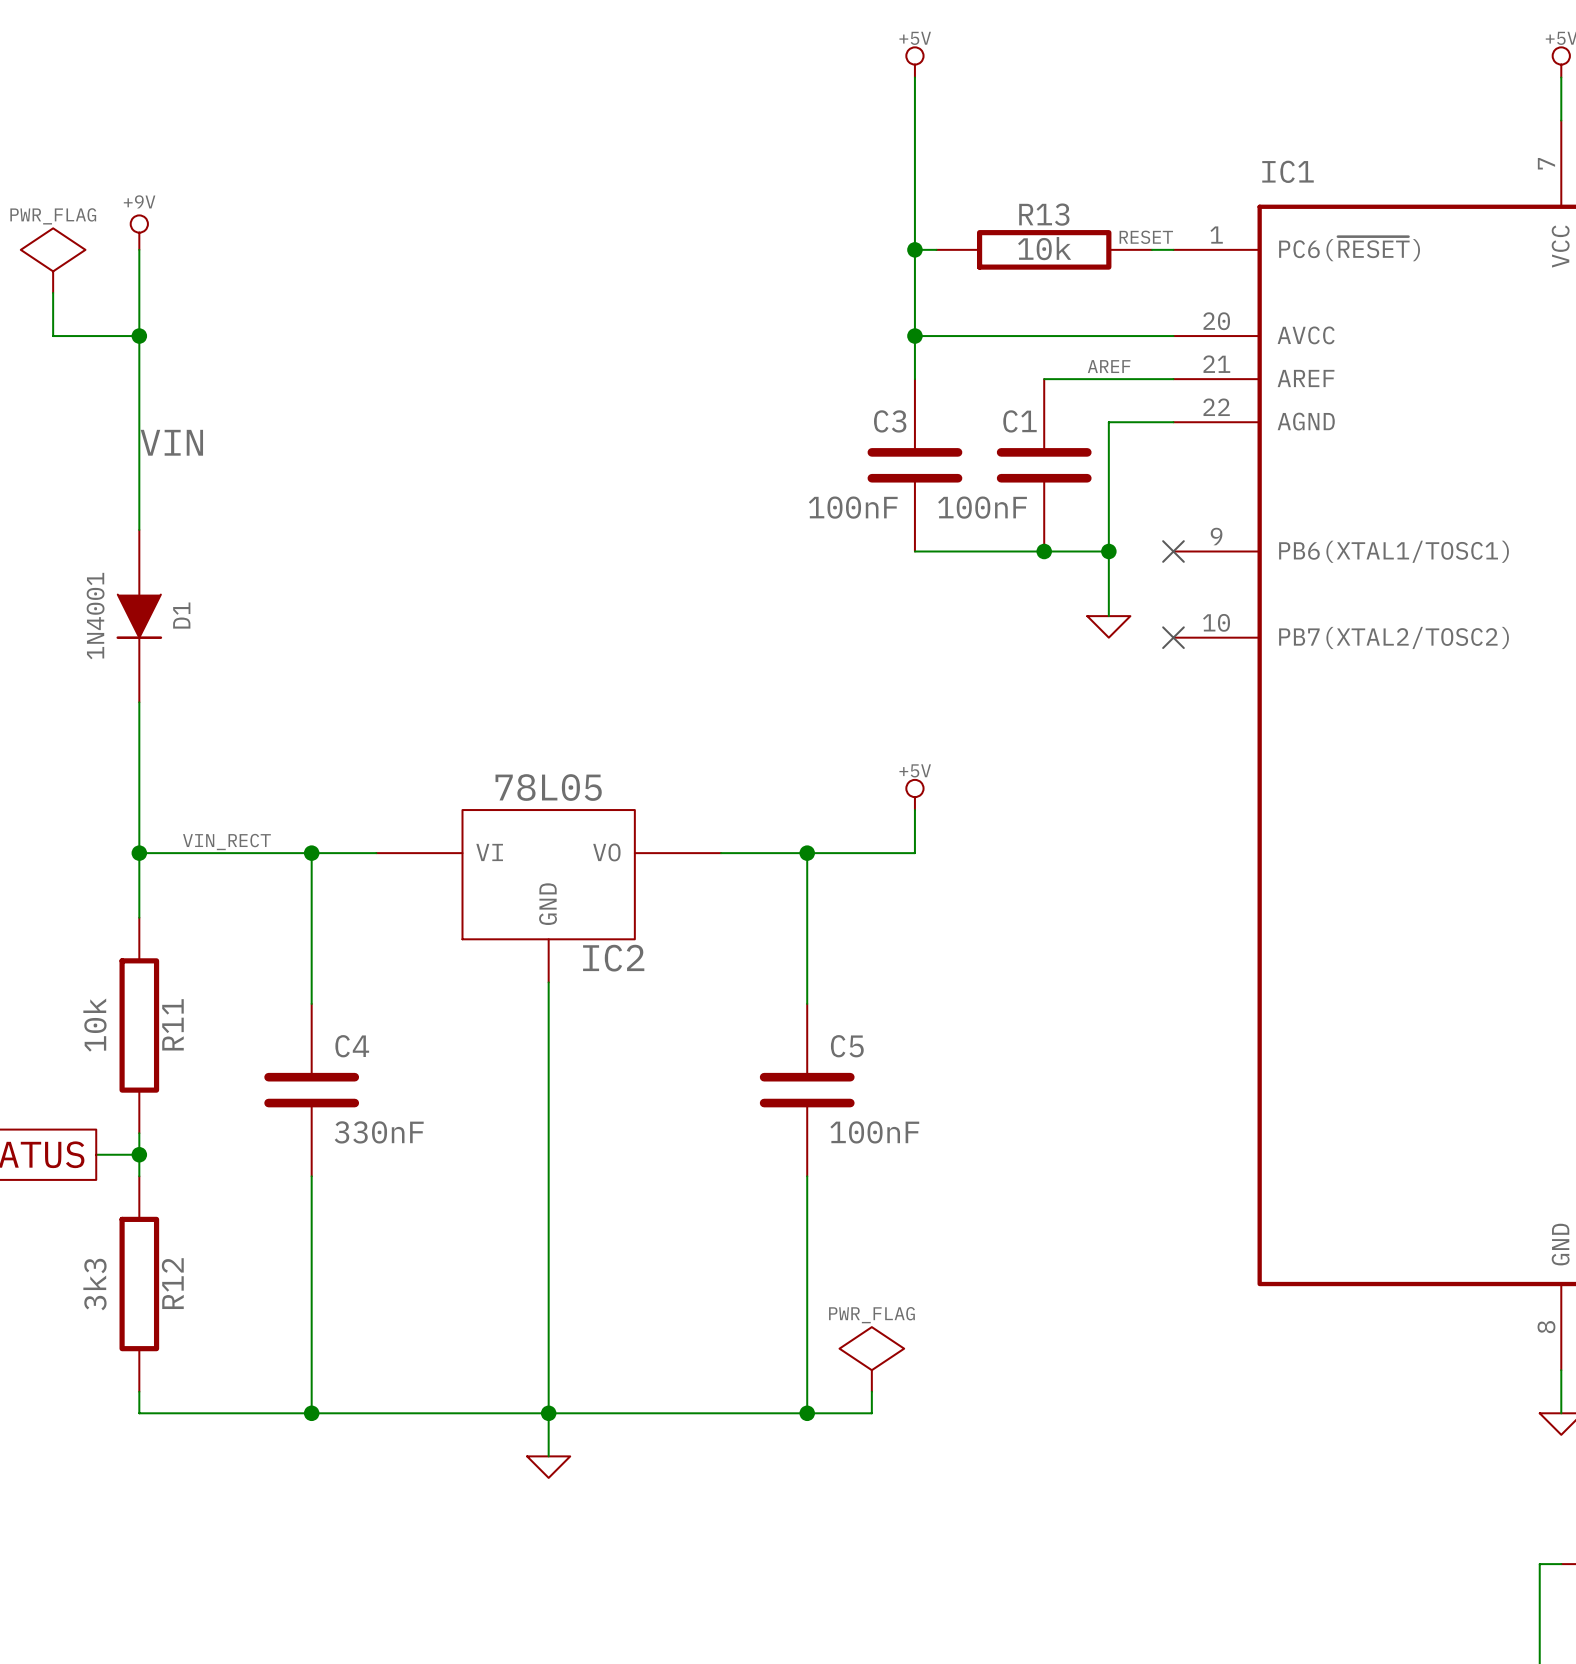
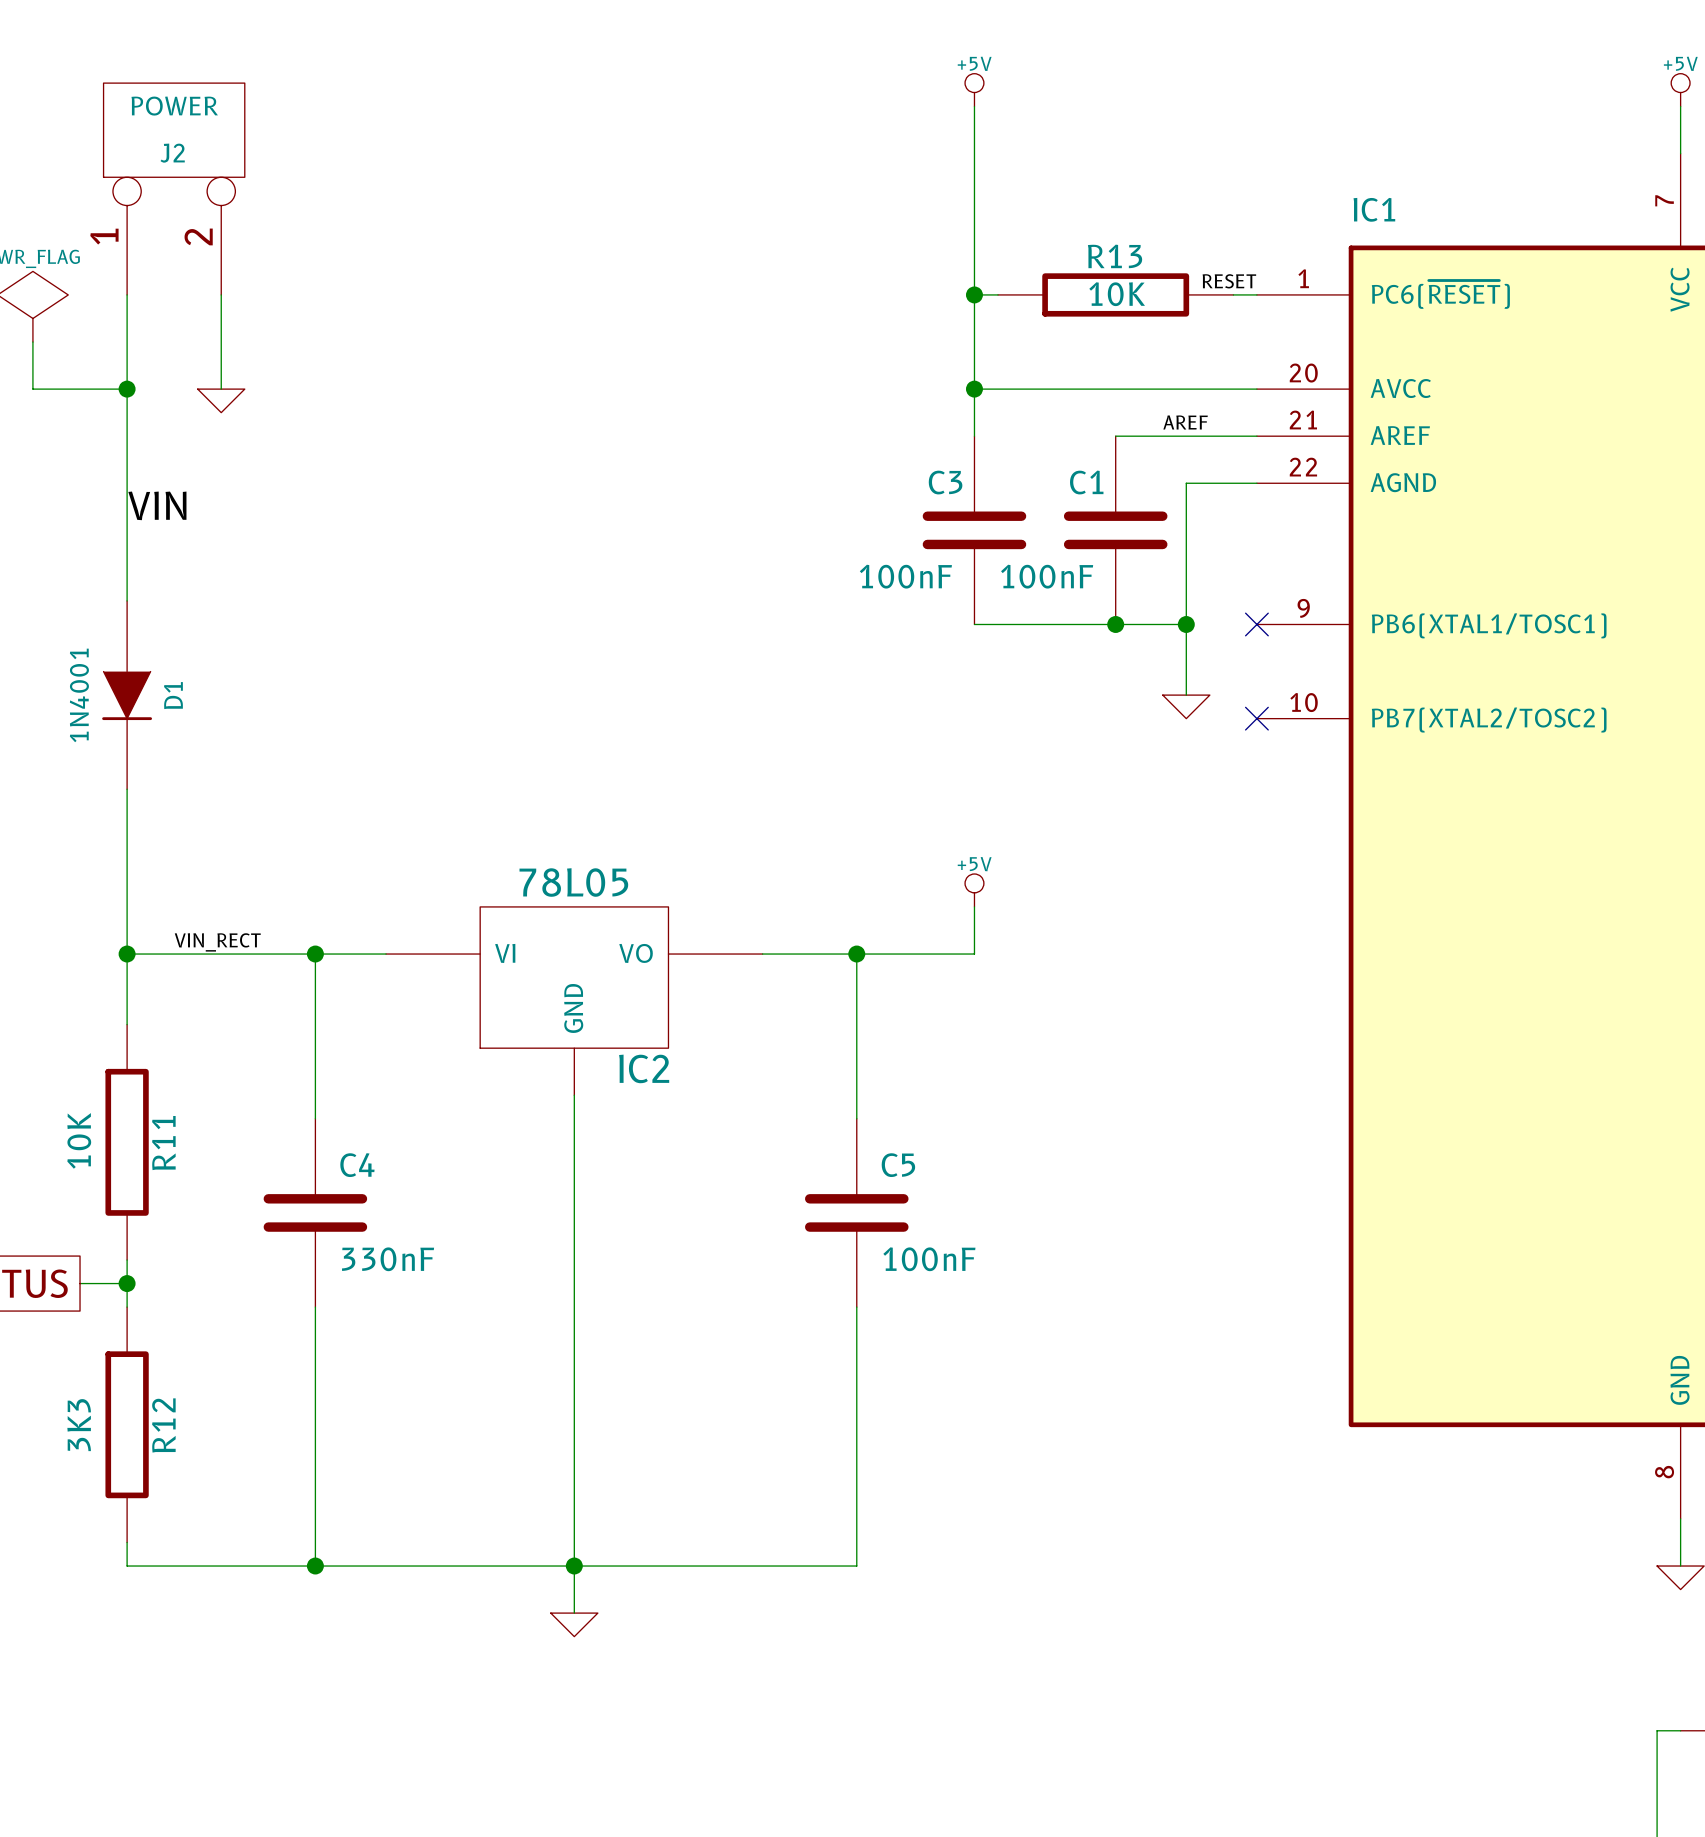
J2: none -> POWER (174, 189)
power symbol: +9V (139, 232) -> none
R13 value: 10k (1044, 248) -> 10K (1117, 294)
wire: none -> (221, 294) (221, 389)
power symbol: none -> (221, 400)
R11 value: 10k (94, 1025) -> 10K (79, 1140)
R12 value: 3k3 (94, 1284) -> 3K3 (79, 1425)
power symbol: PWR_FLAG (871, 1359) -> none
wire: (871, 1391) (871, 1413) (807, 1413) -> none
junction: (807, 1413) -> none

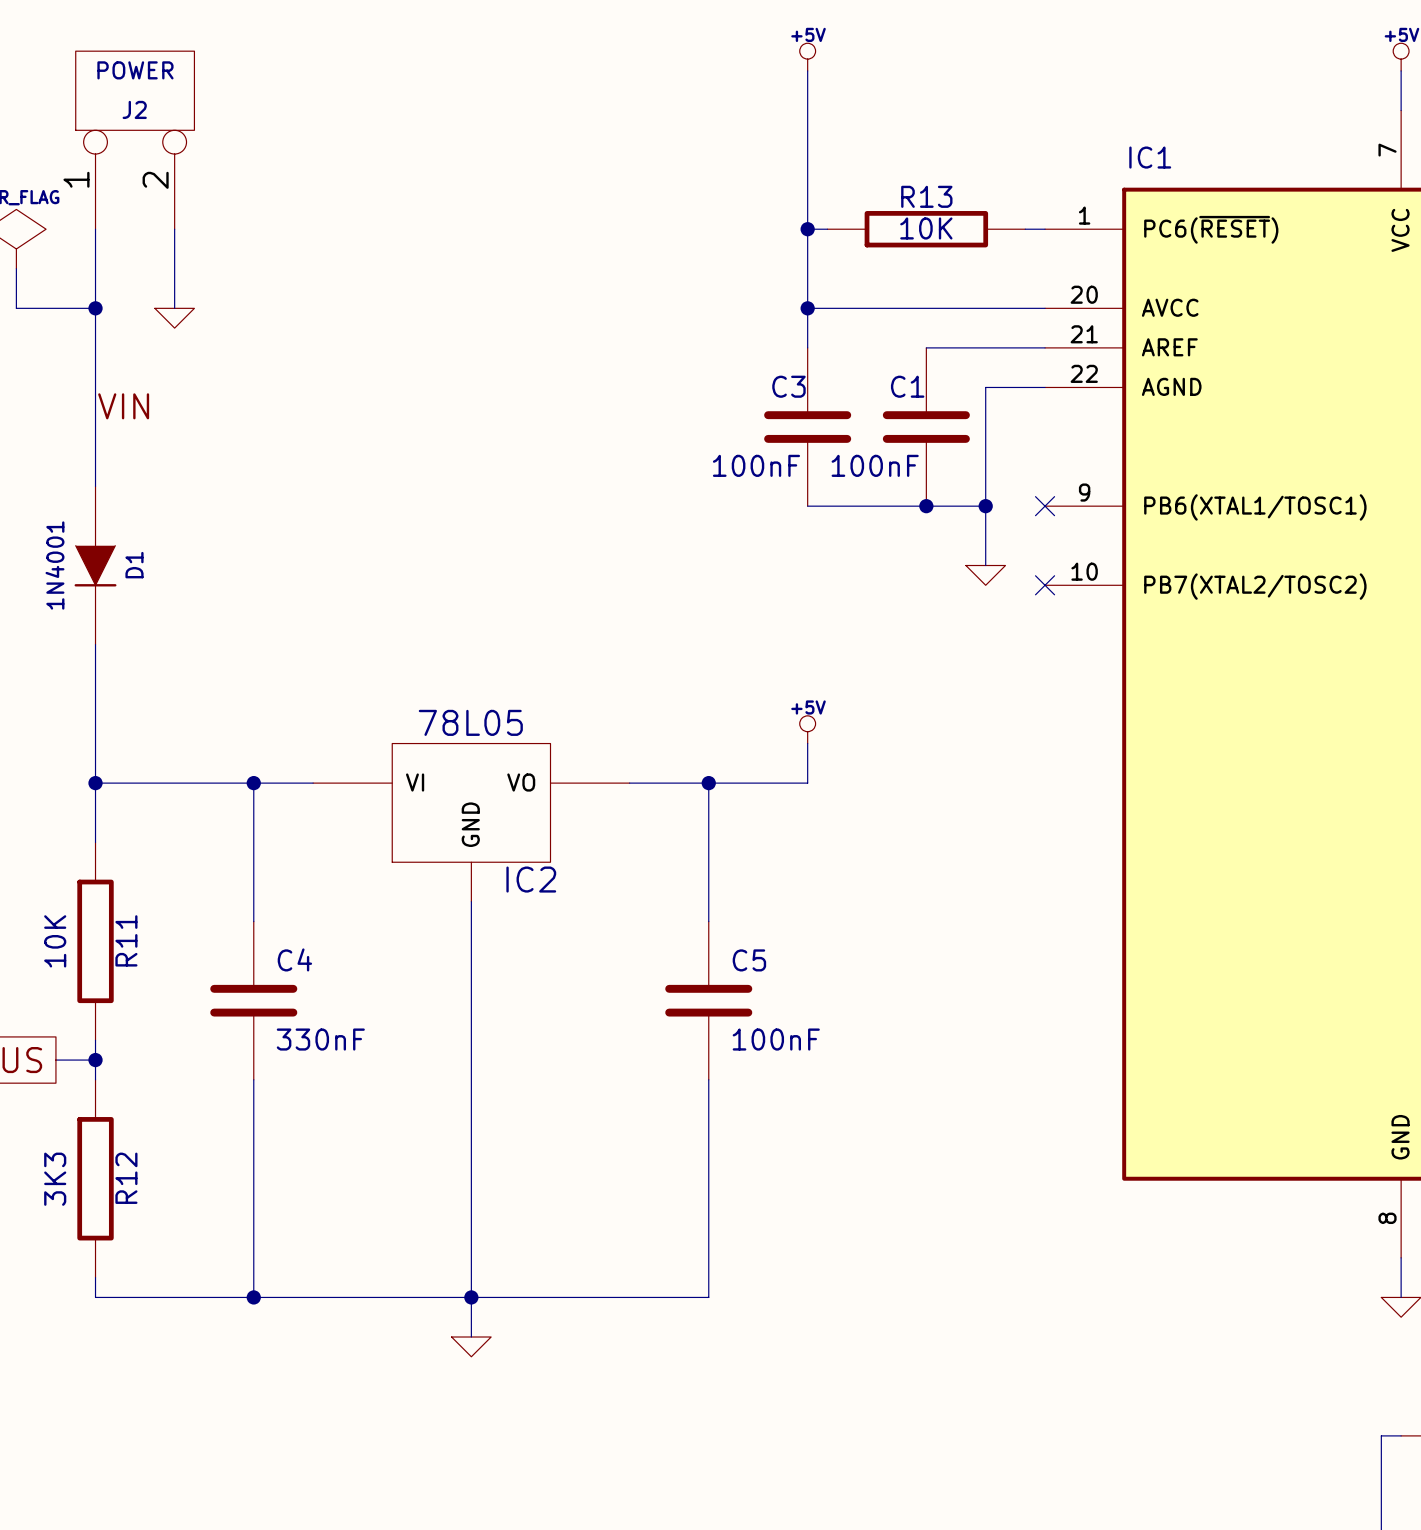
label: RESET (1229, 281) -> none
label: AREF (1185, 422) -> none
label: VIN_RECT (217, 942) -> none

